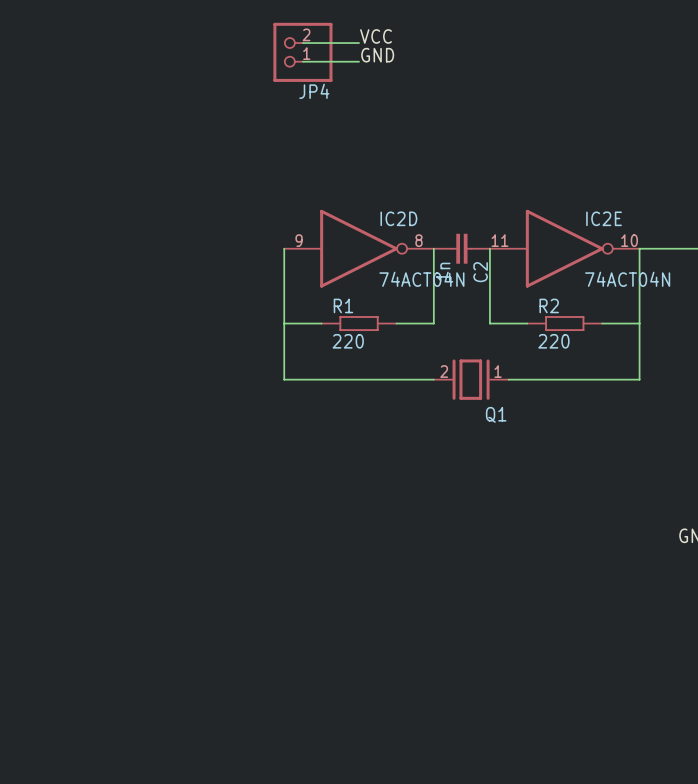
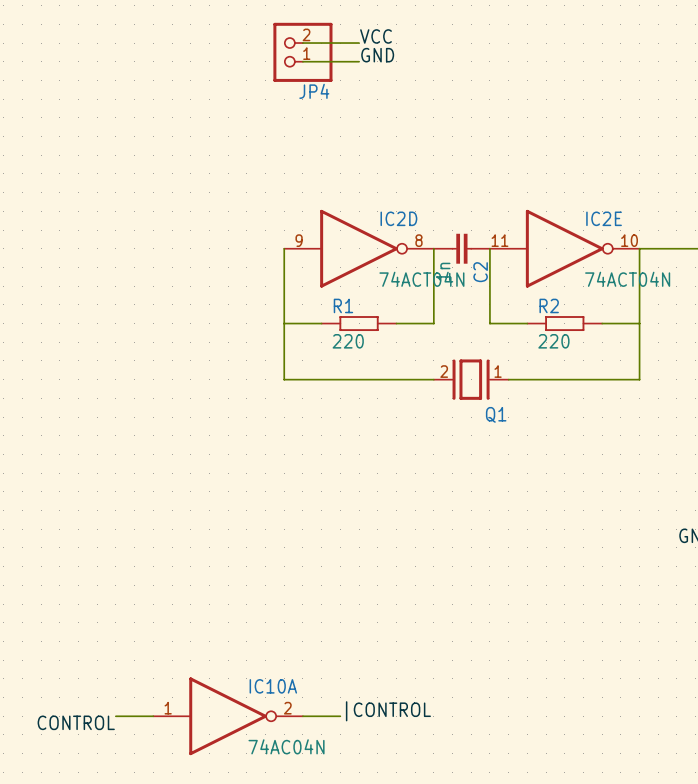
label: none -> |CONTROL (388, 711)
wire: none -> (115, 716) (153, 716)
IC10A: none -> 74AC04N (228, 716)
wire: none -> (302, 716) (340, 716)
label: none -> CONTROL (76, 722)

